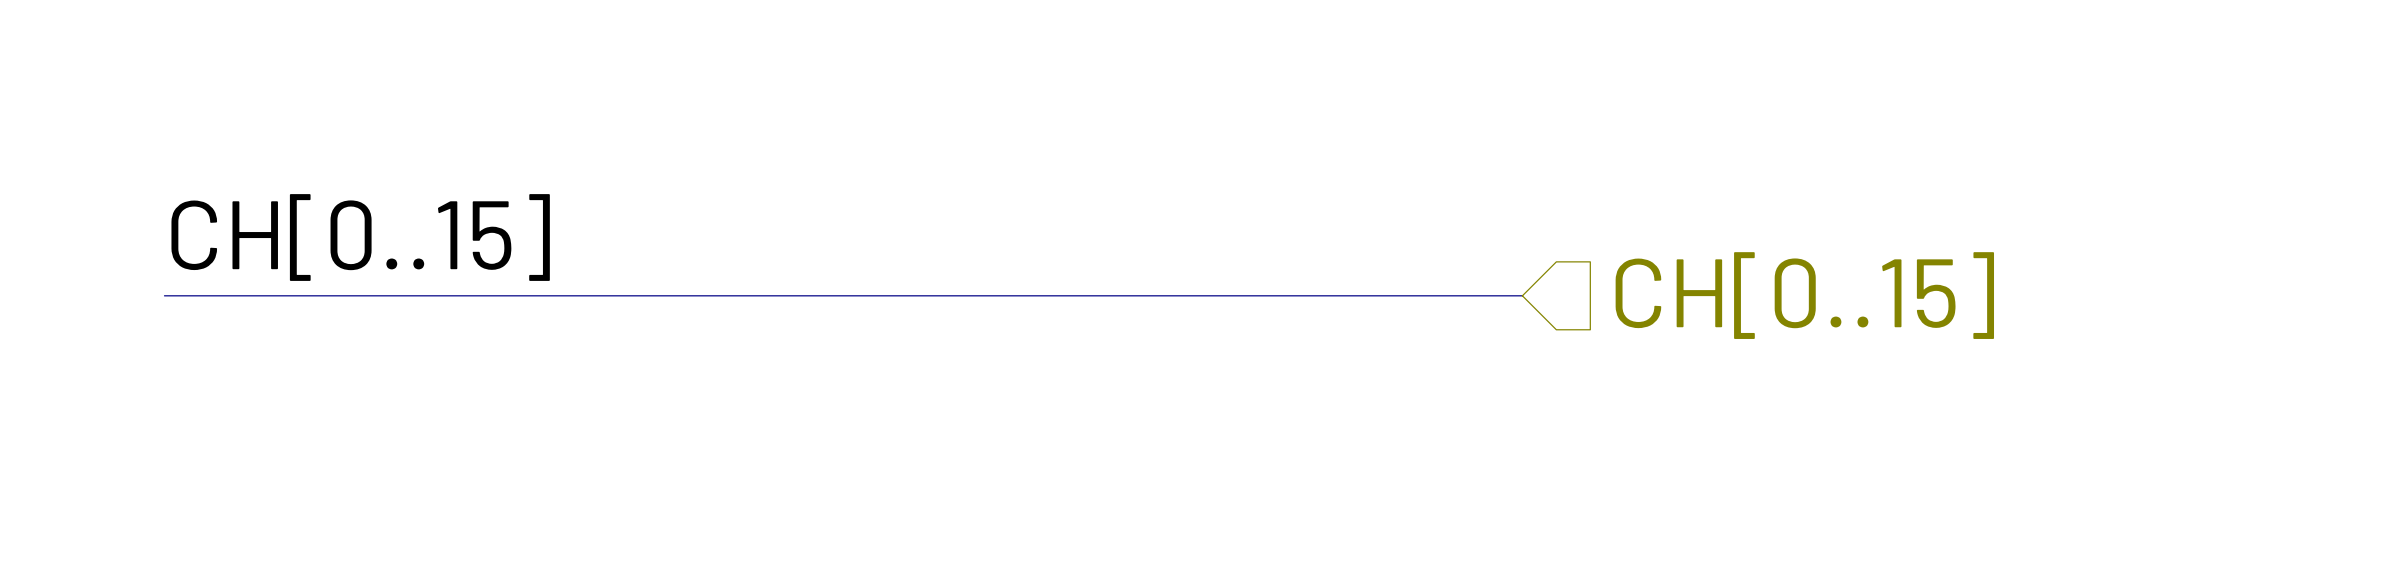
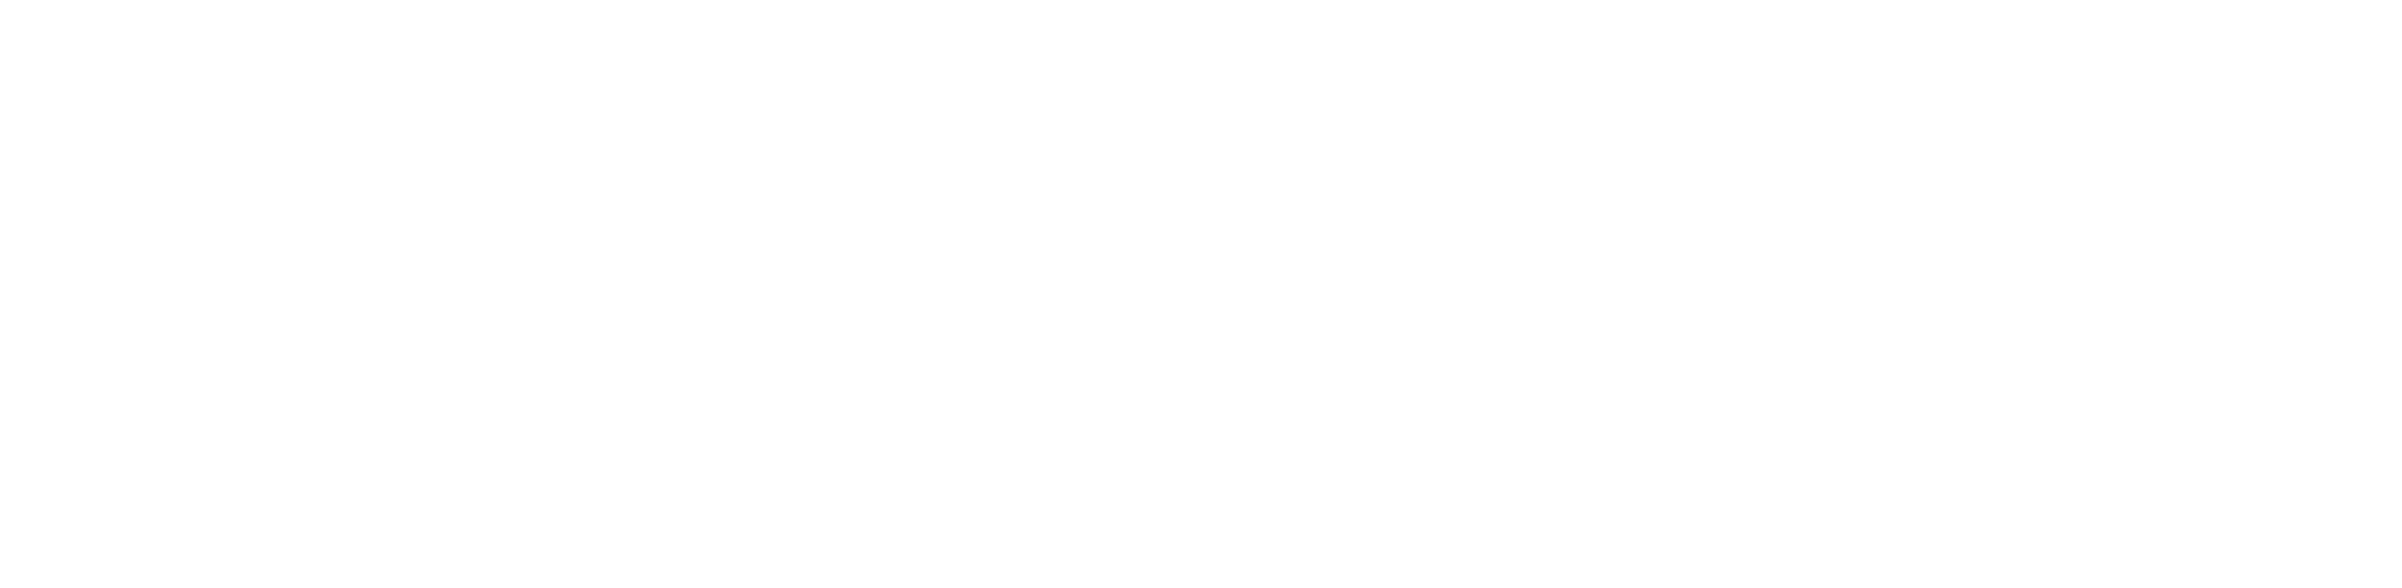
label: CH[0..15] (360, 237) -> none
bus: (164, 295) (1522, 295) -> none
hierarchical label: CH[0..15] (1804, 295) -> none

